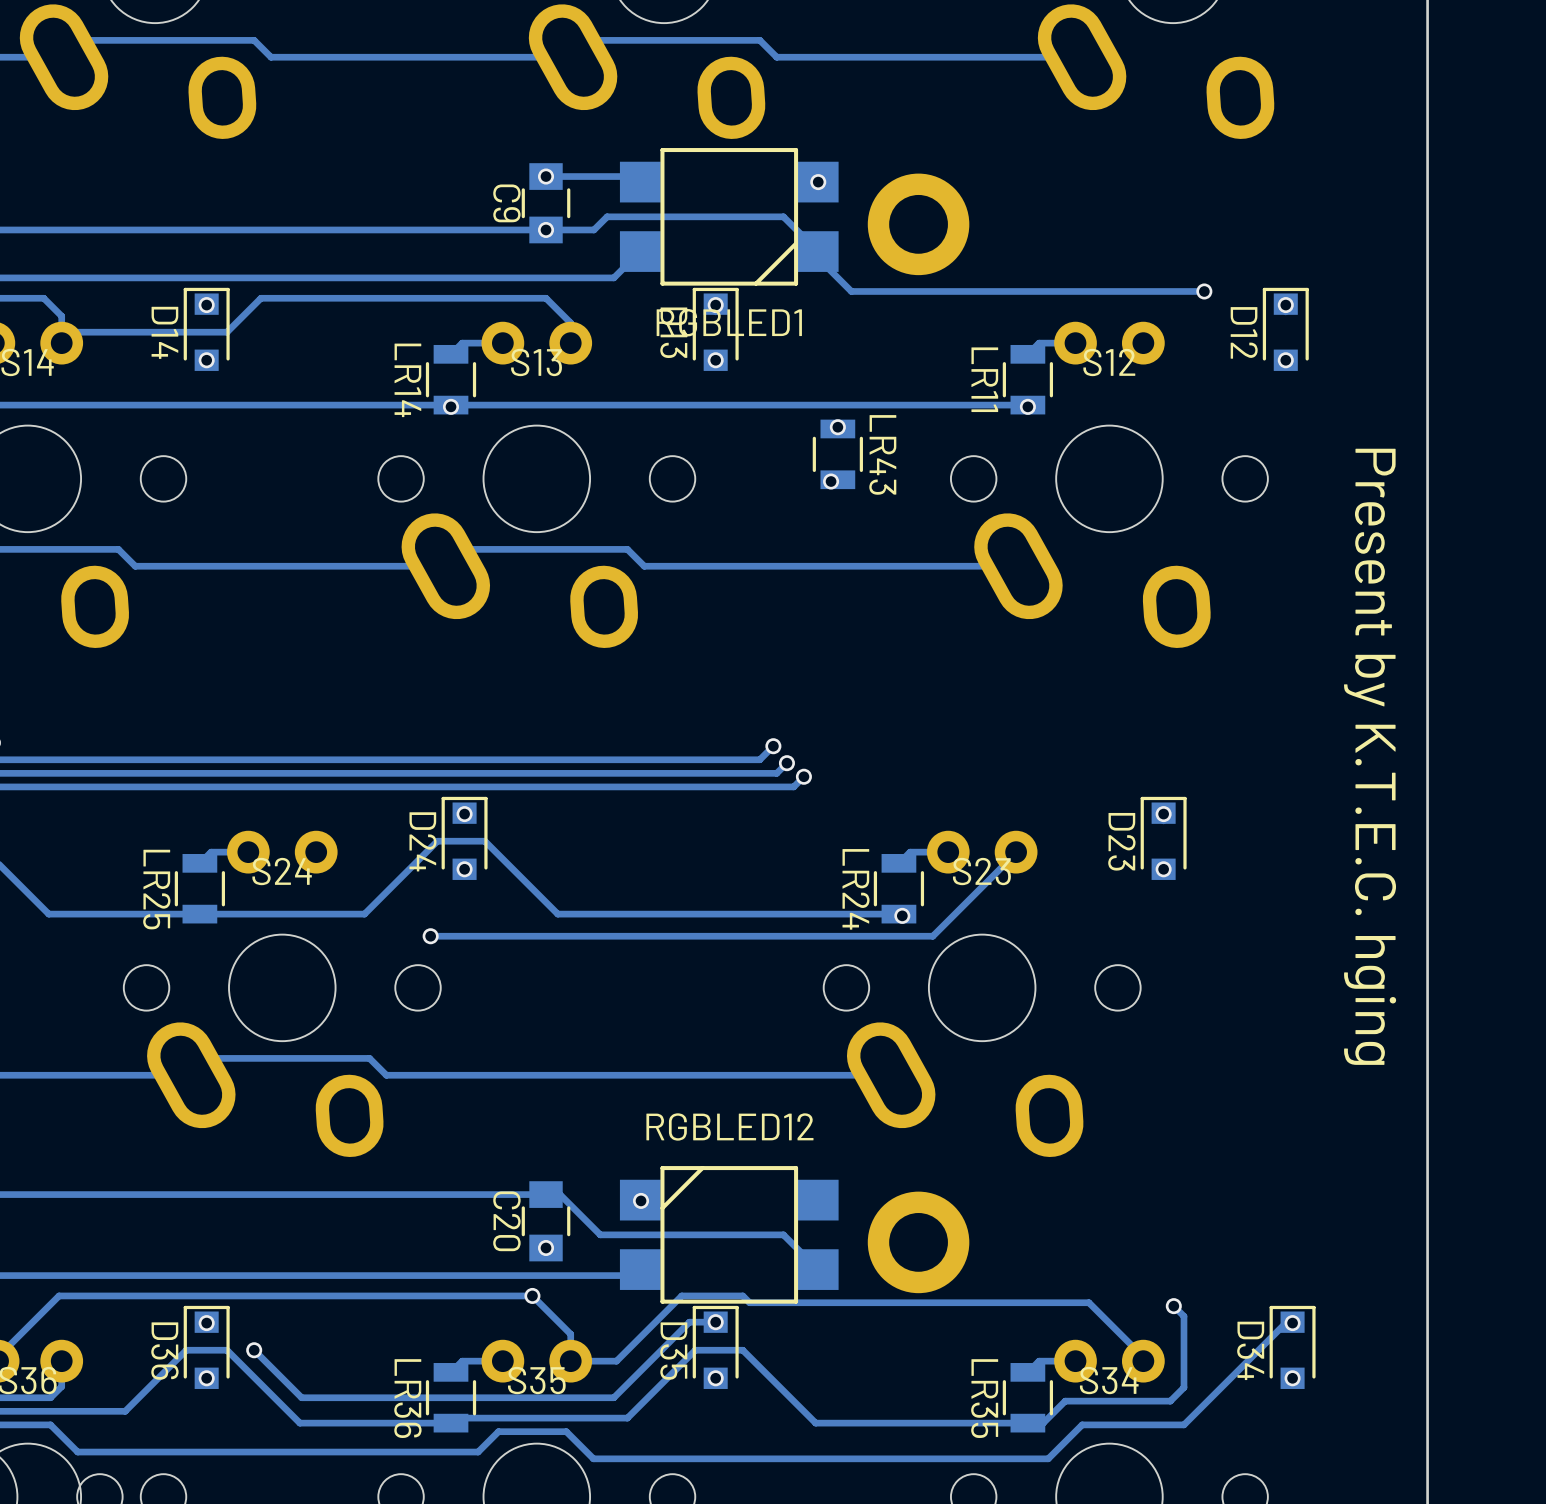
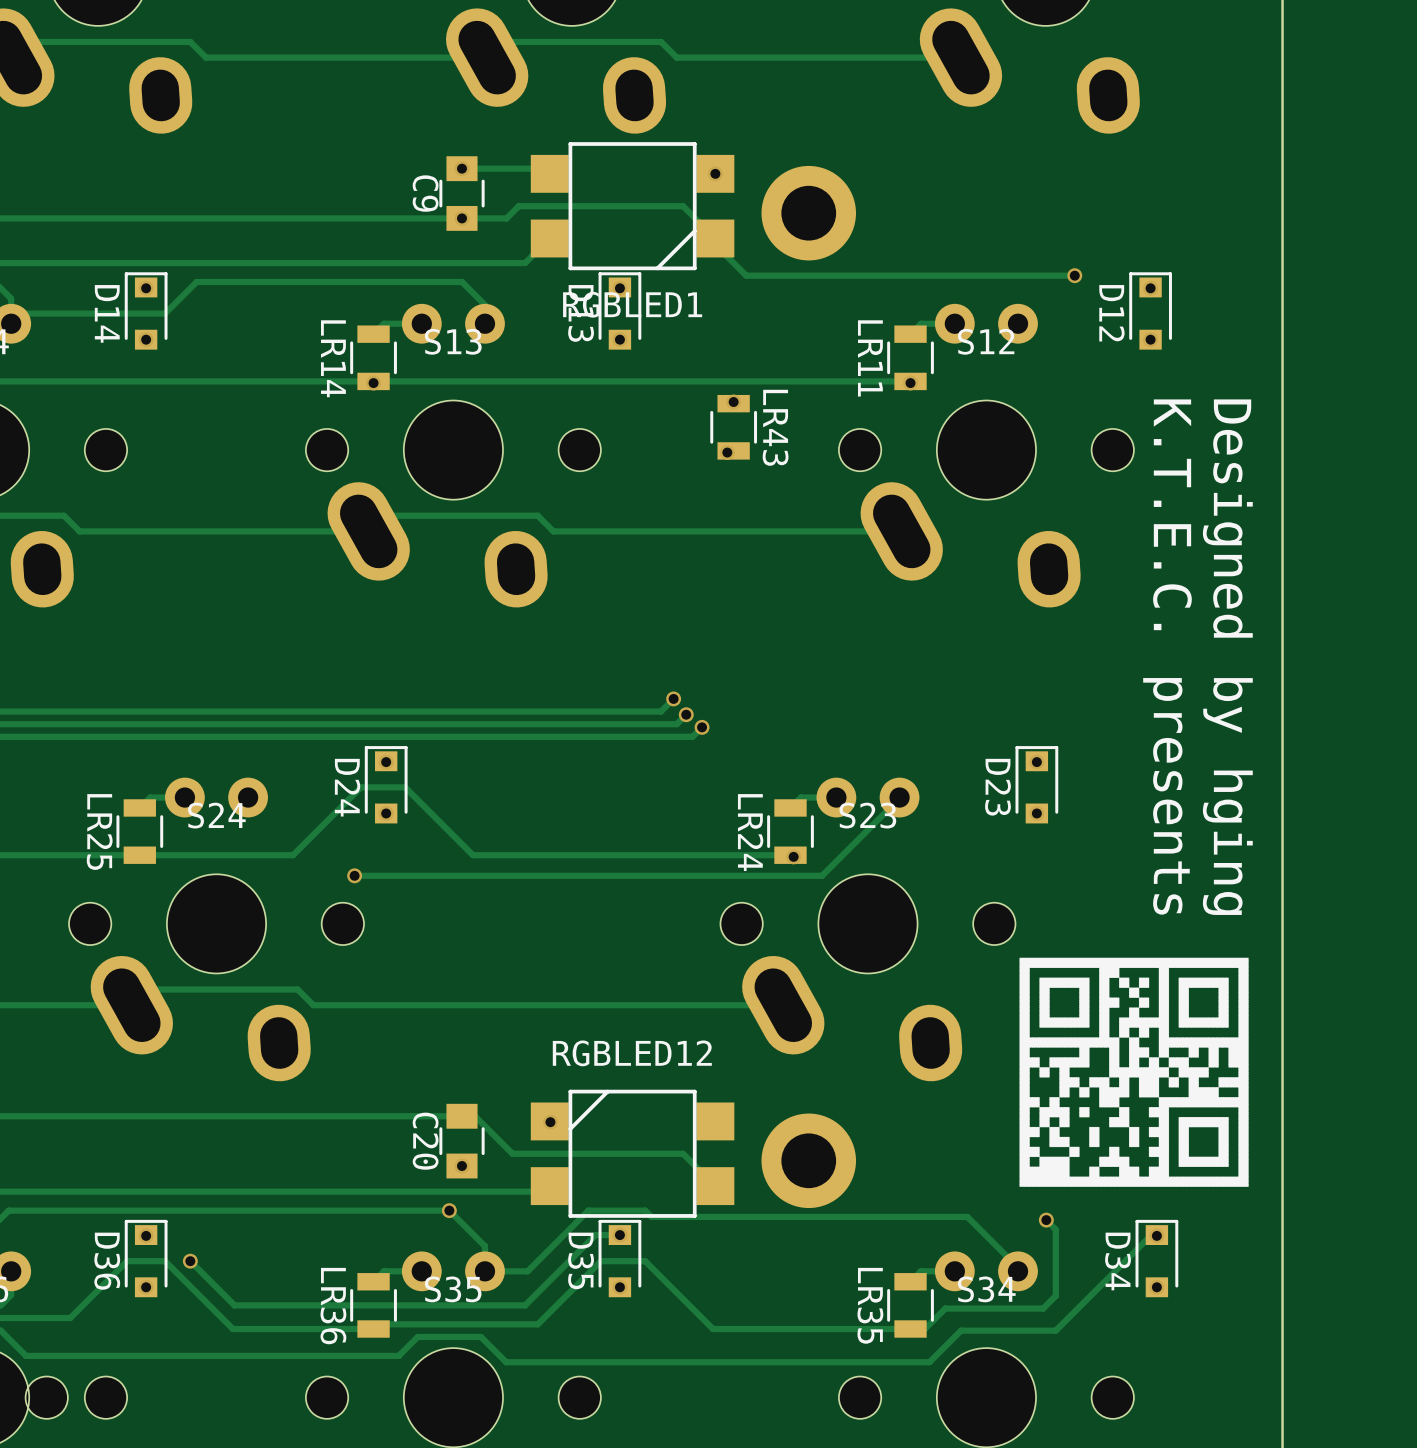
text: none -> Designed by hging (1227, 657)
text: none -> K.T.E.C. presents (1167, 657)
text: Present by K.T.E.C. hging (1370, 756) -> none
drawing: none -> [1019, 957, 1249, 1187]

